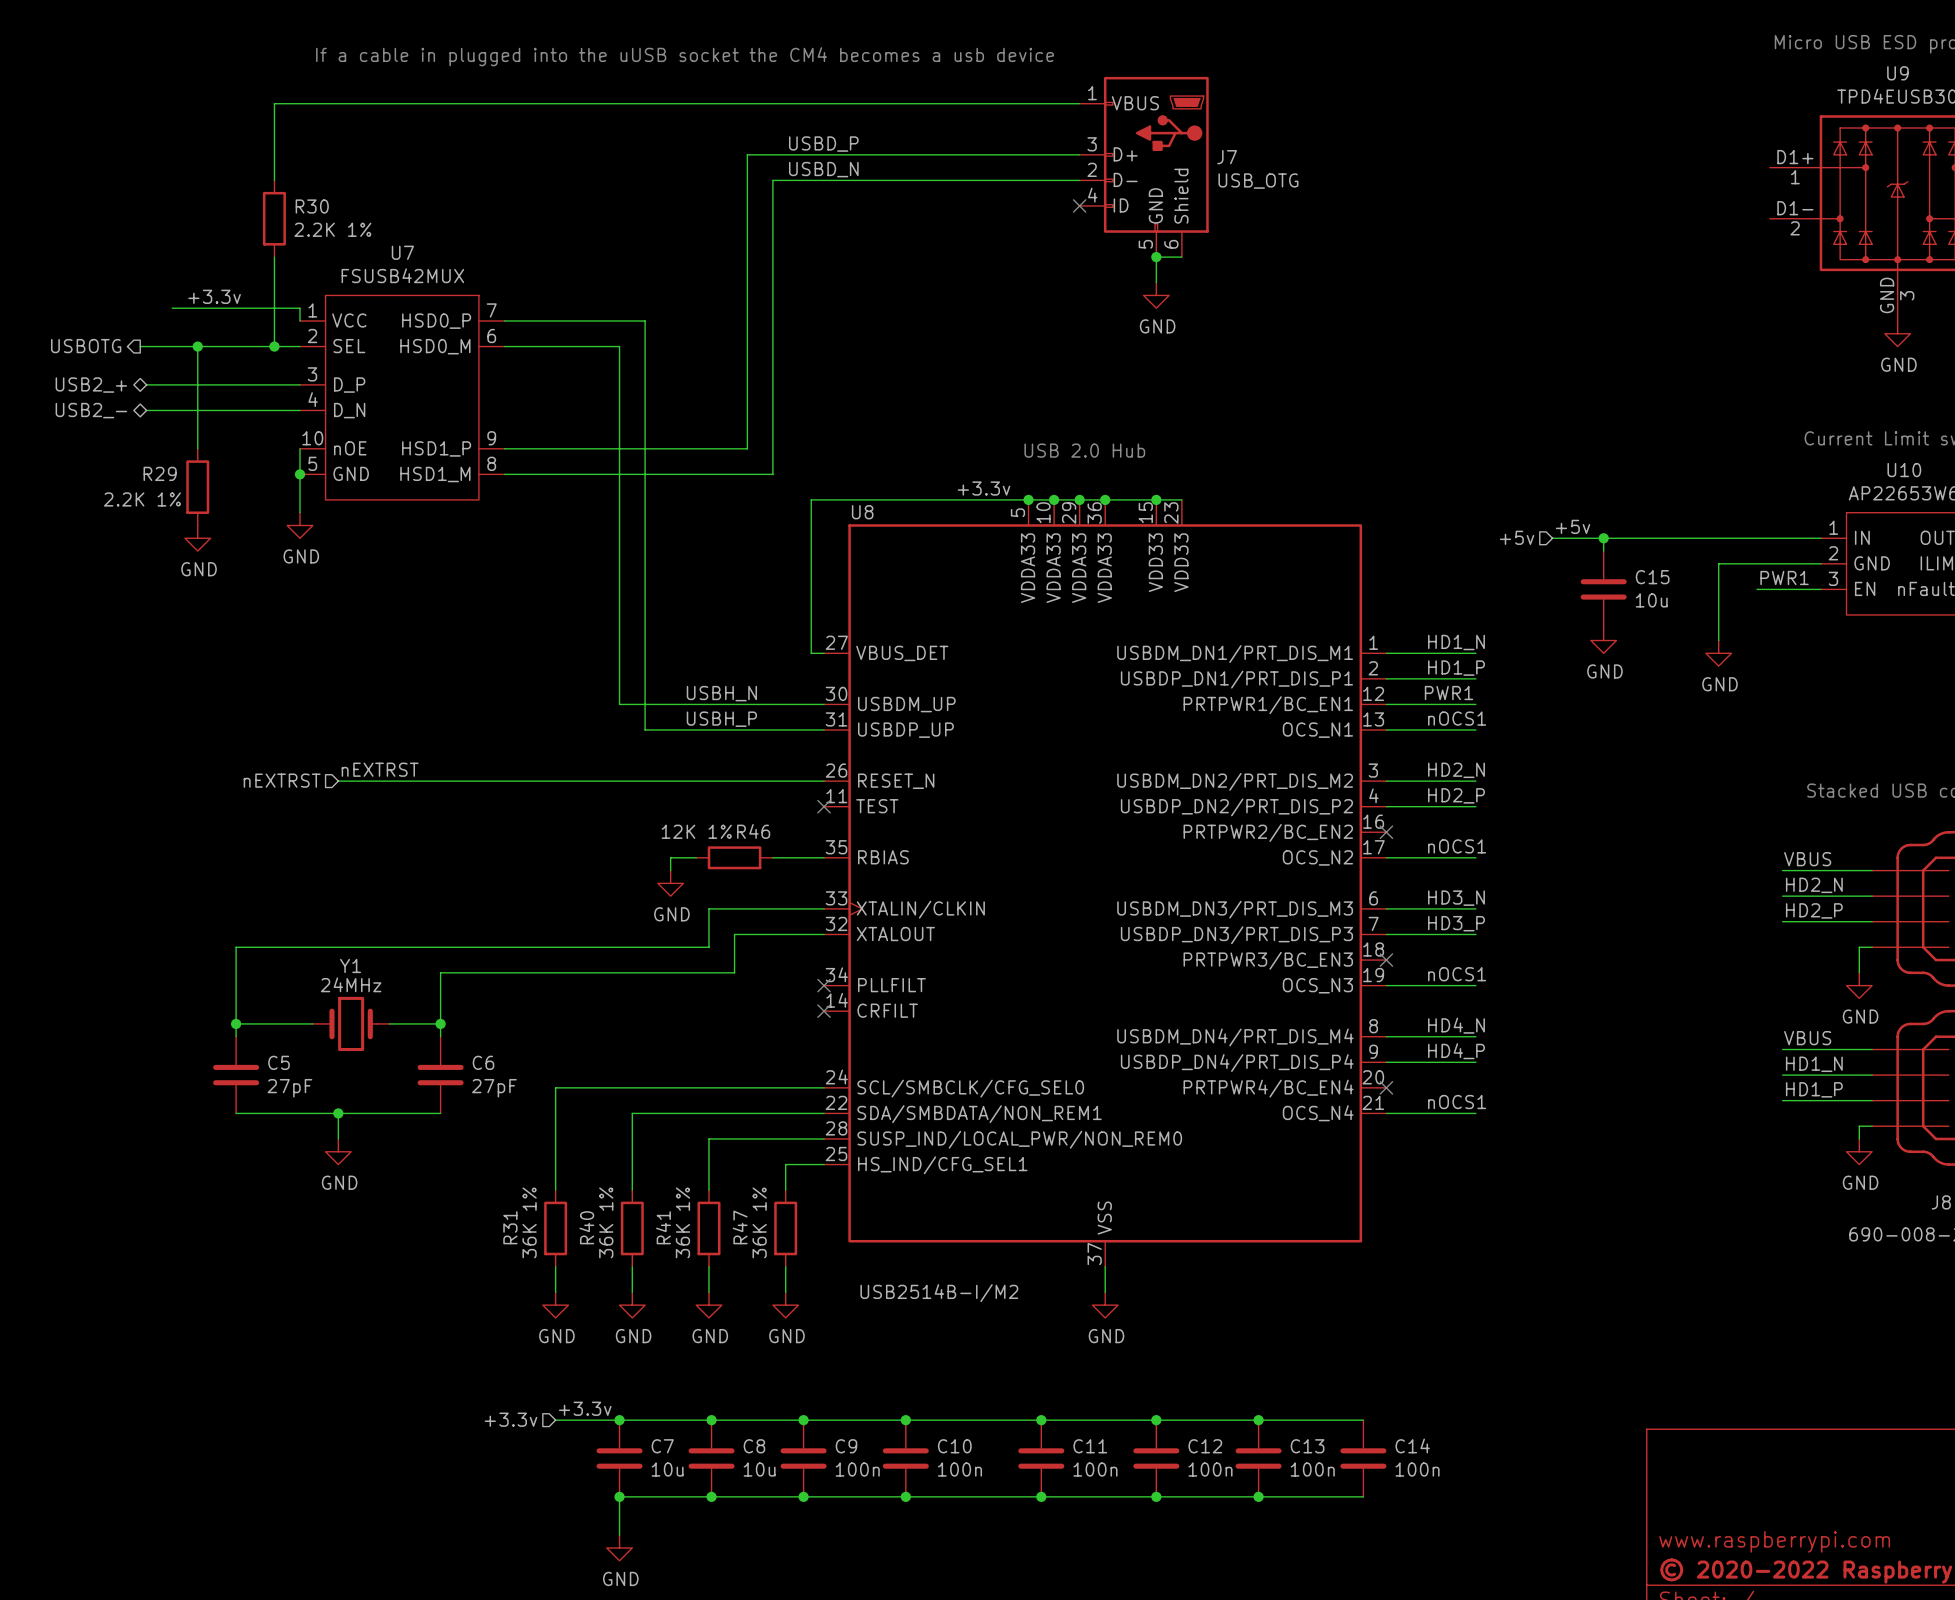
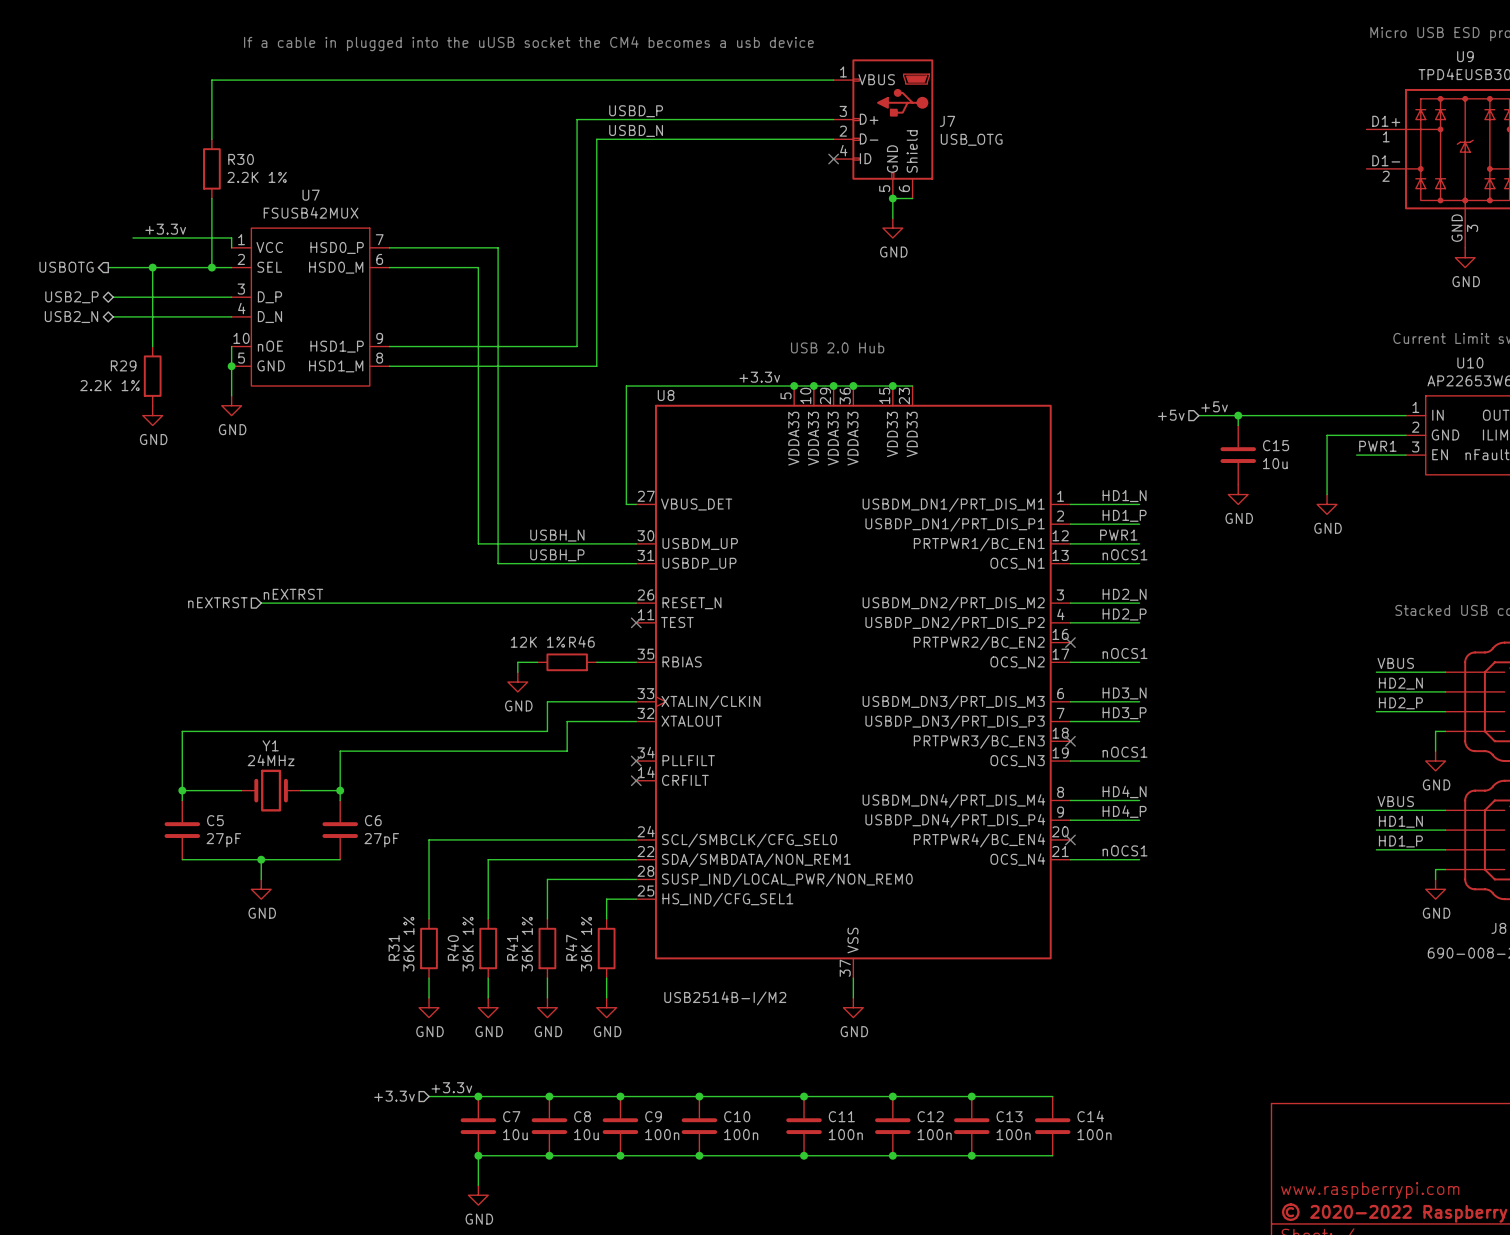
hierarchical label: USB2_+ (91, 385) -> USB2_P (71, 297)
hierarchical label: USB2_- (91, 410) -> USB2_N (71, 317)

